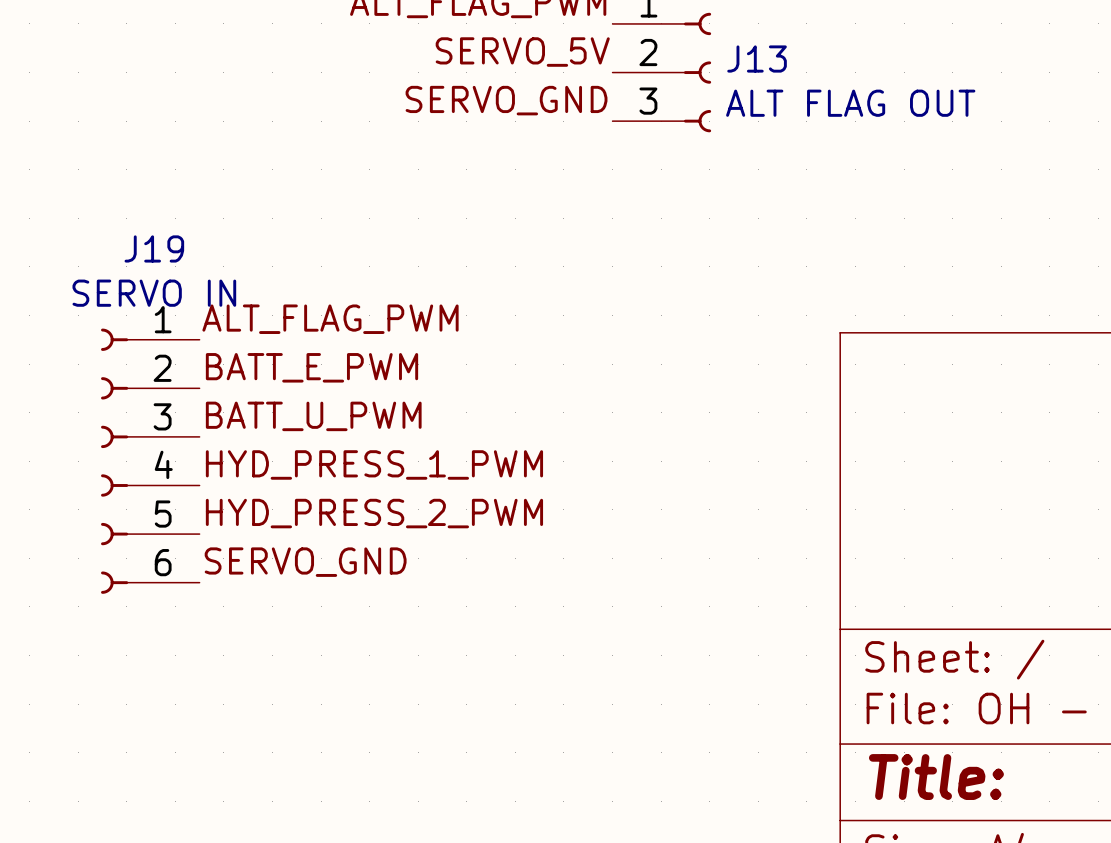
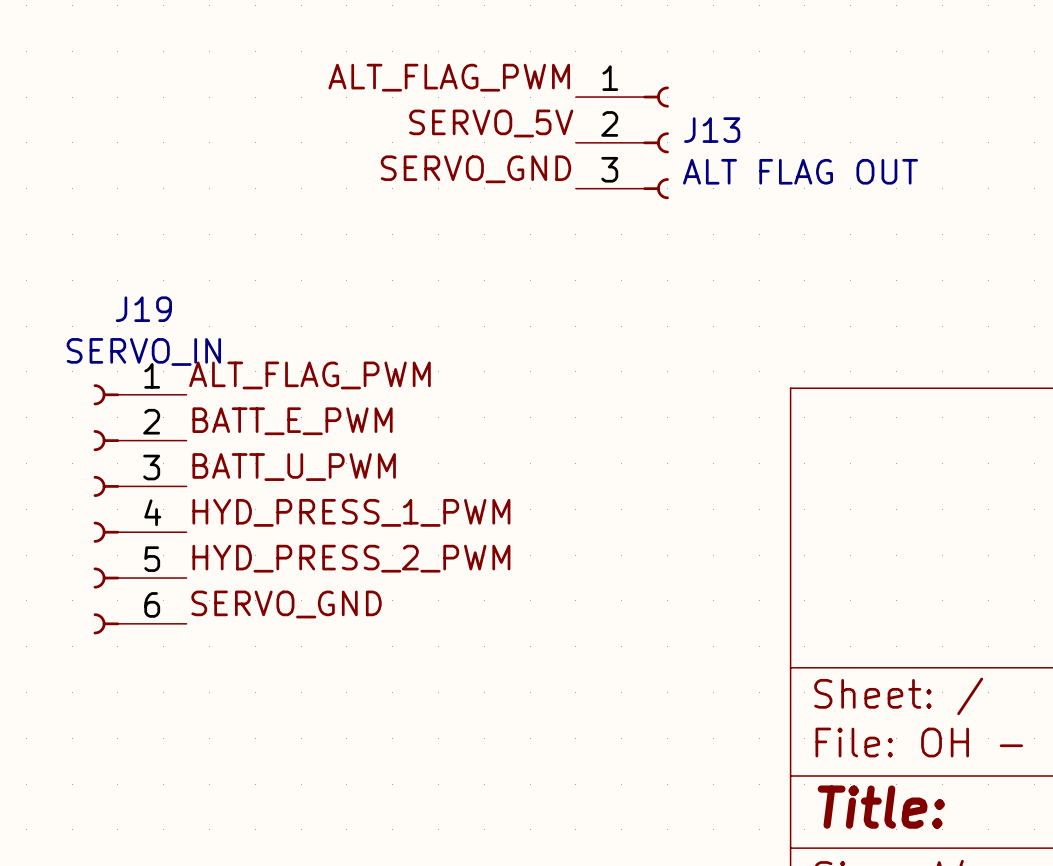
J19 value: SERVO IN (154, 293) -> SERVO_IN (143, 351)

